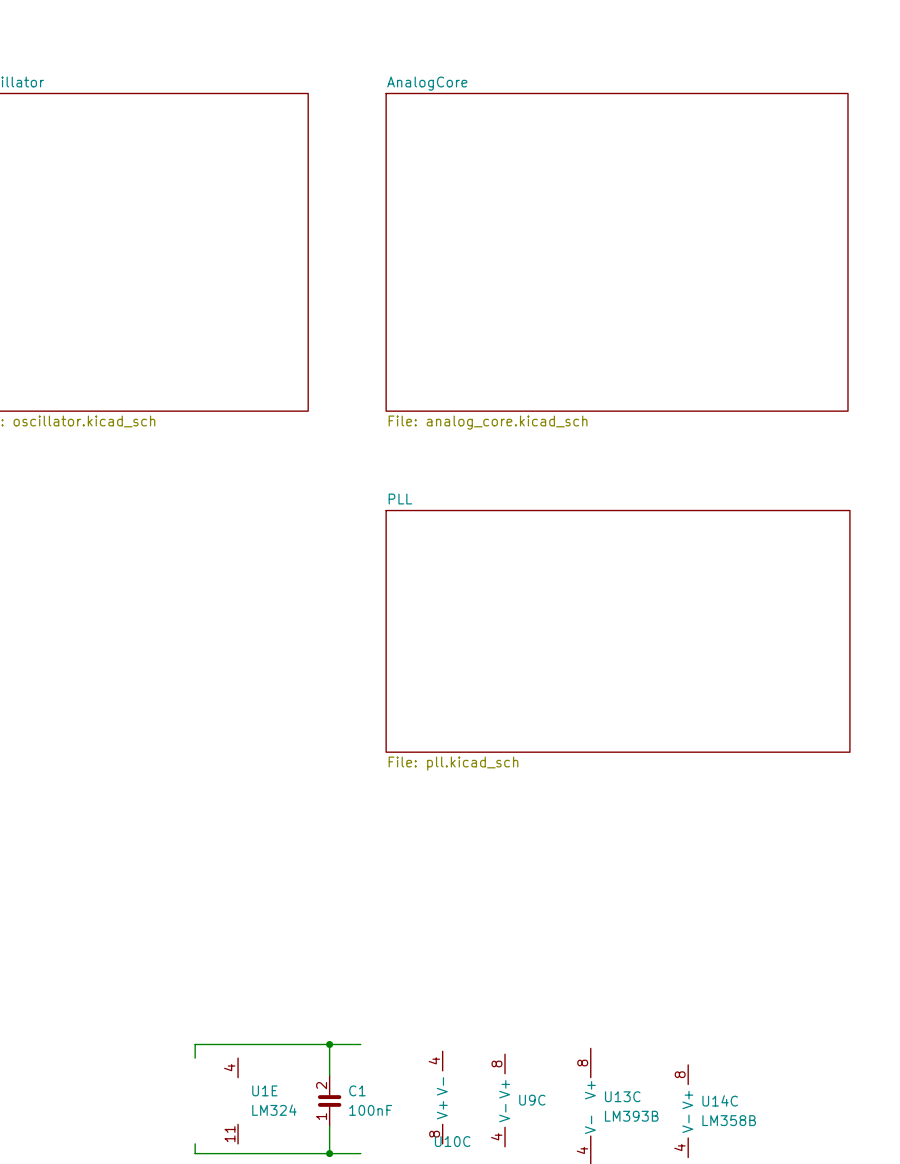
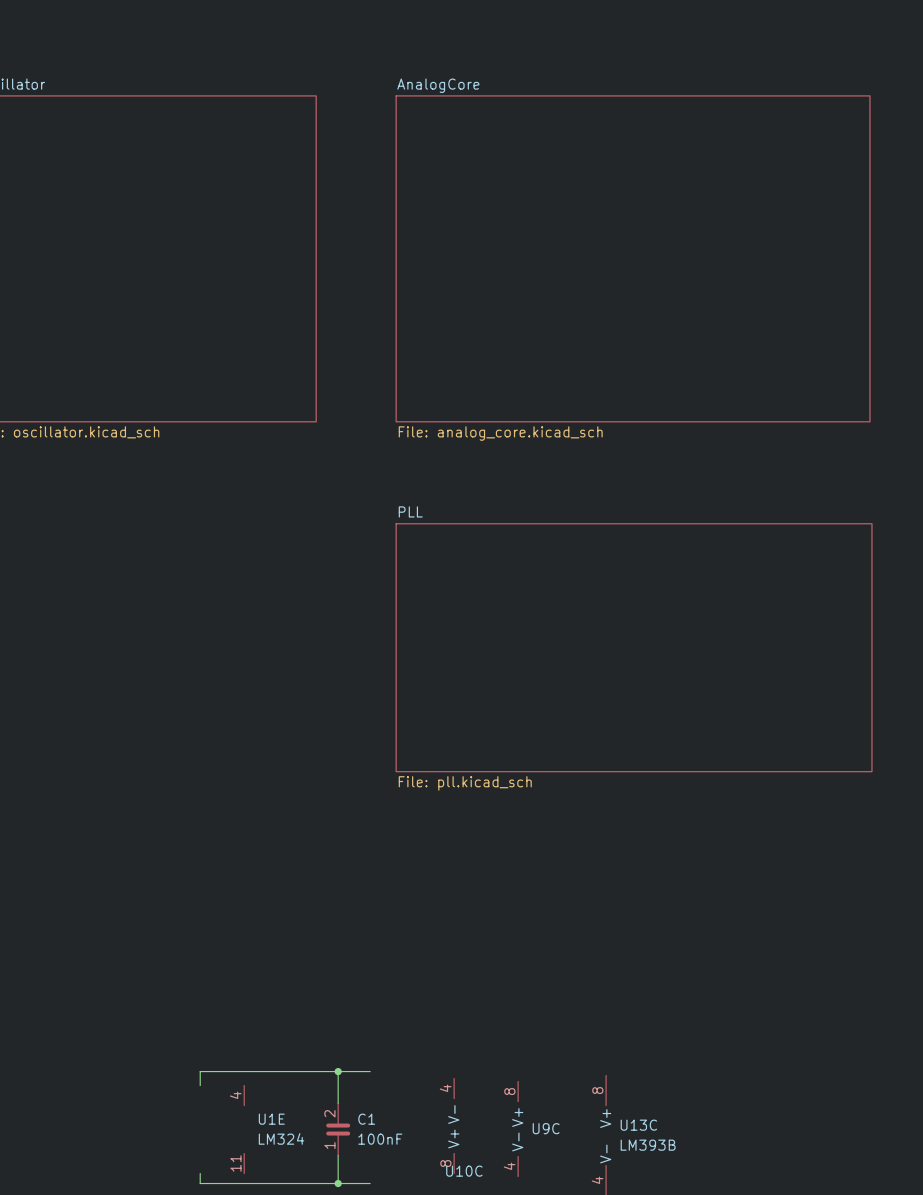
U14C: LM358B (688, 1111) -> none

